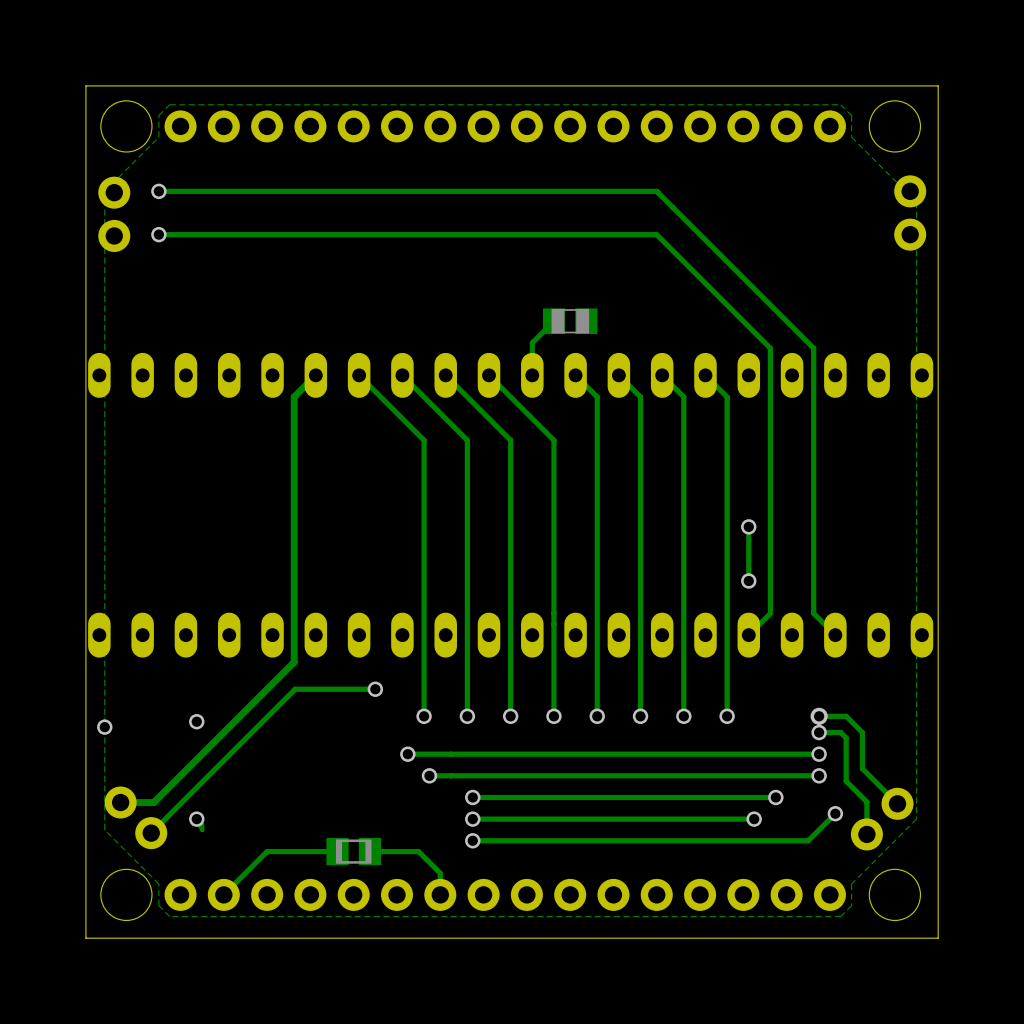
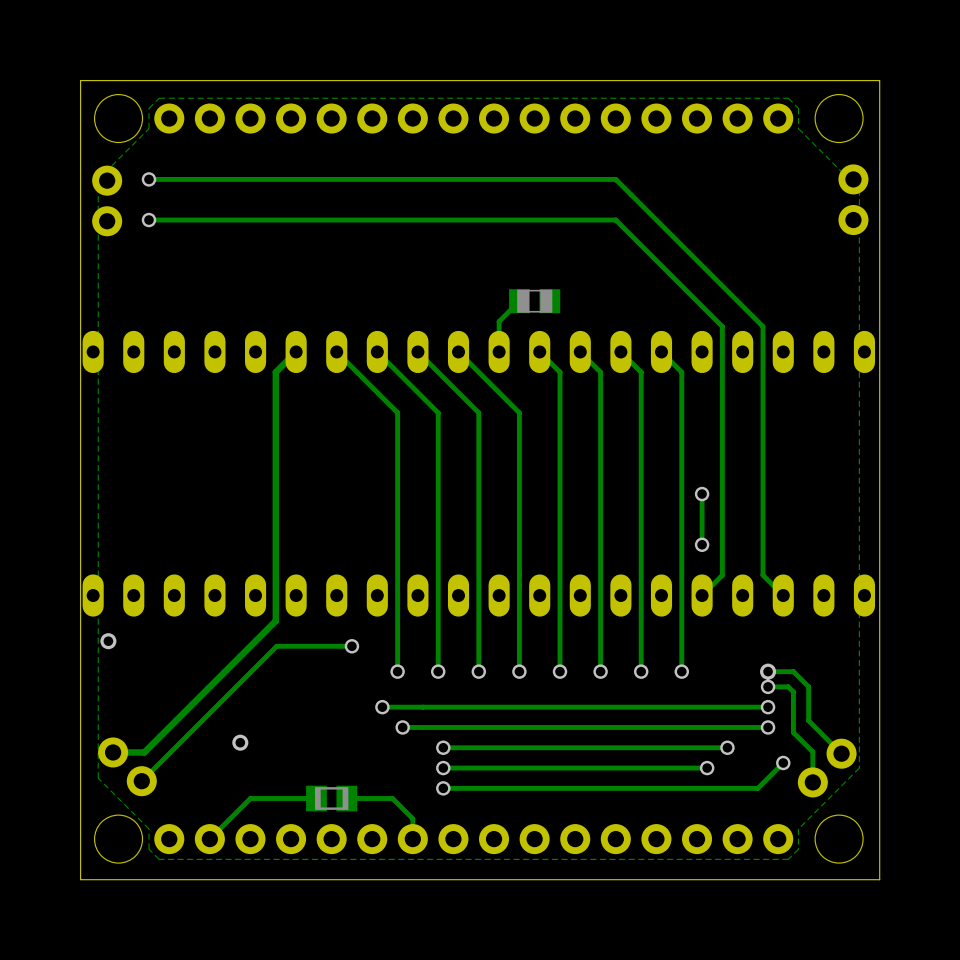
via: none -> (108, 641)
via: (196, 721) -> none
via: (104, 727) -> none
via: none -> (240, 742)
track: (196, 819) (202, 829) (202, 824) -> none
via: (196, 819) -> none

